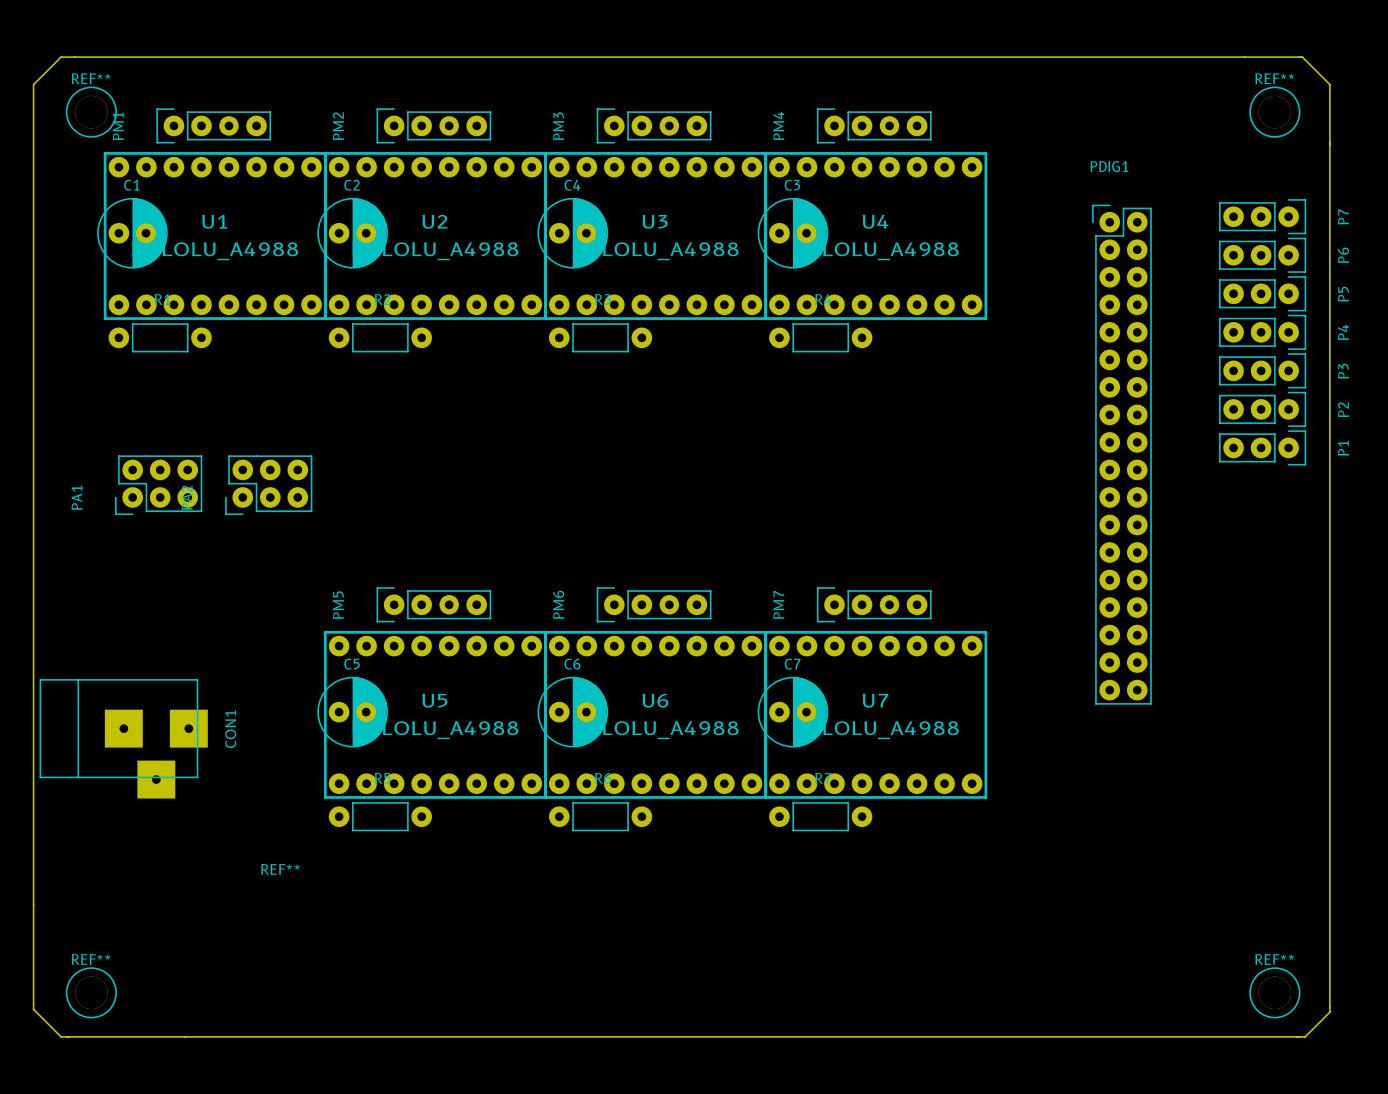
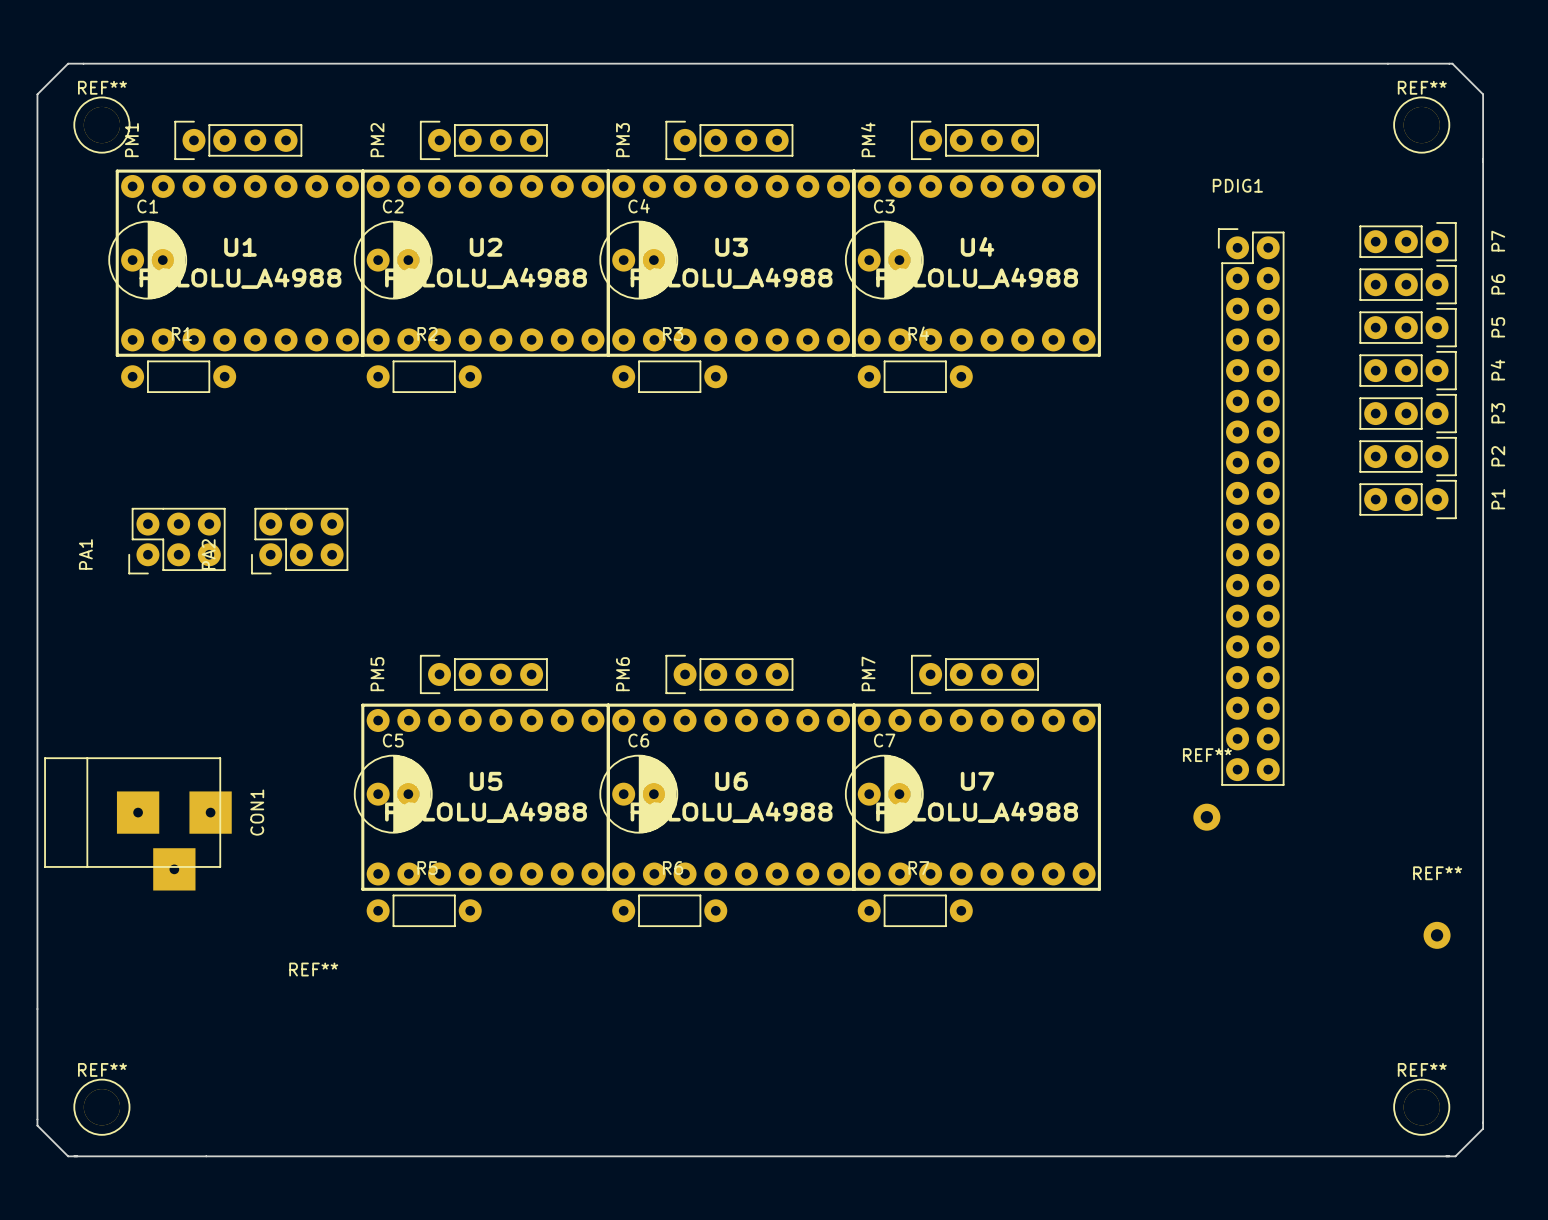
REF**: none -> (1206, 817)
REF**: none -> (1437, 935)

